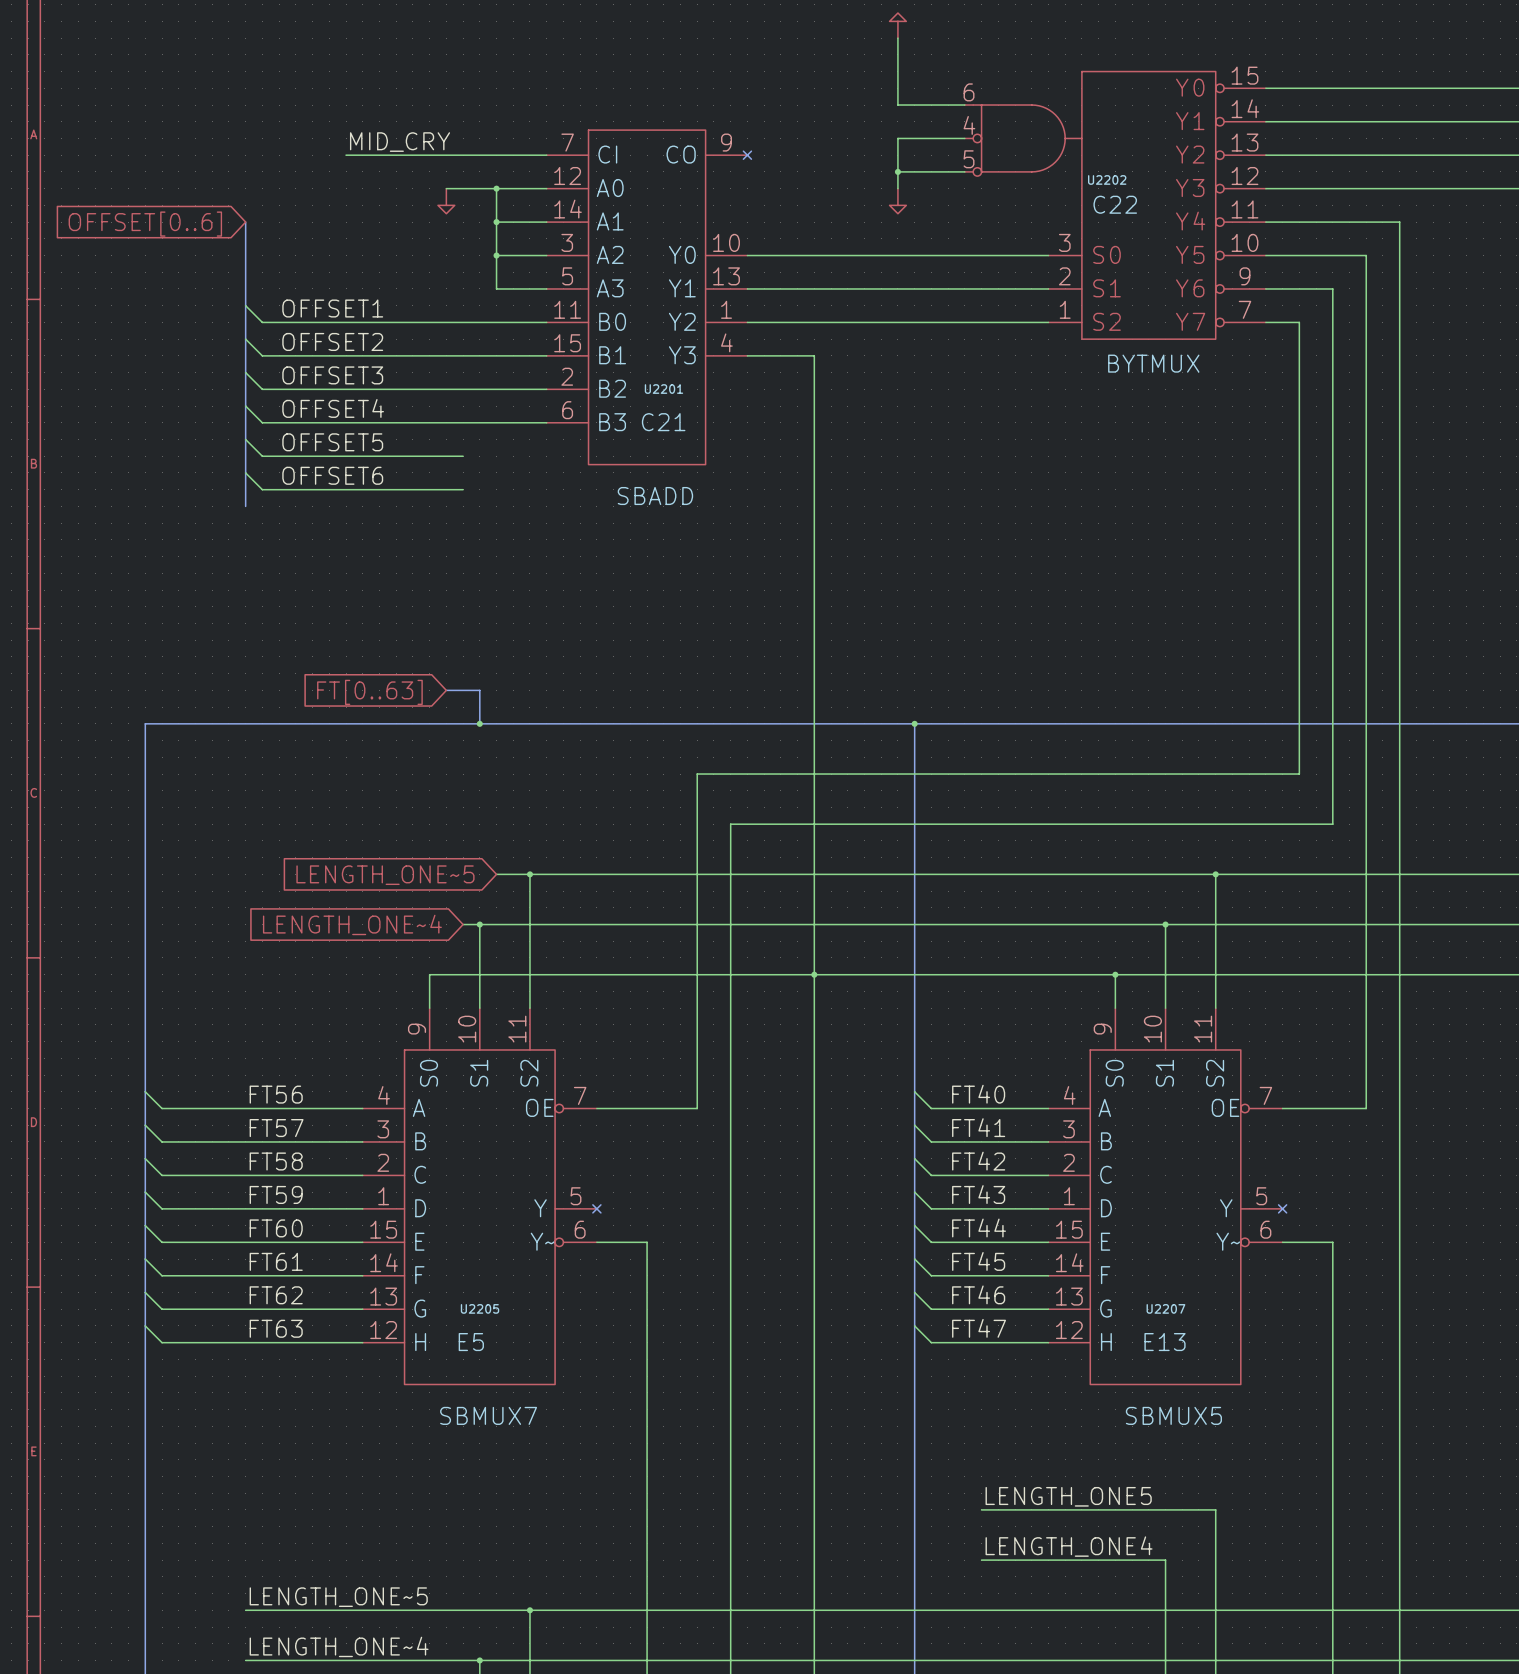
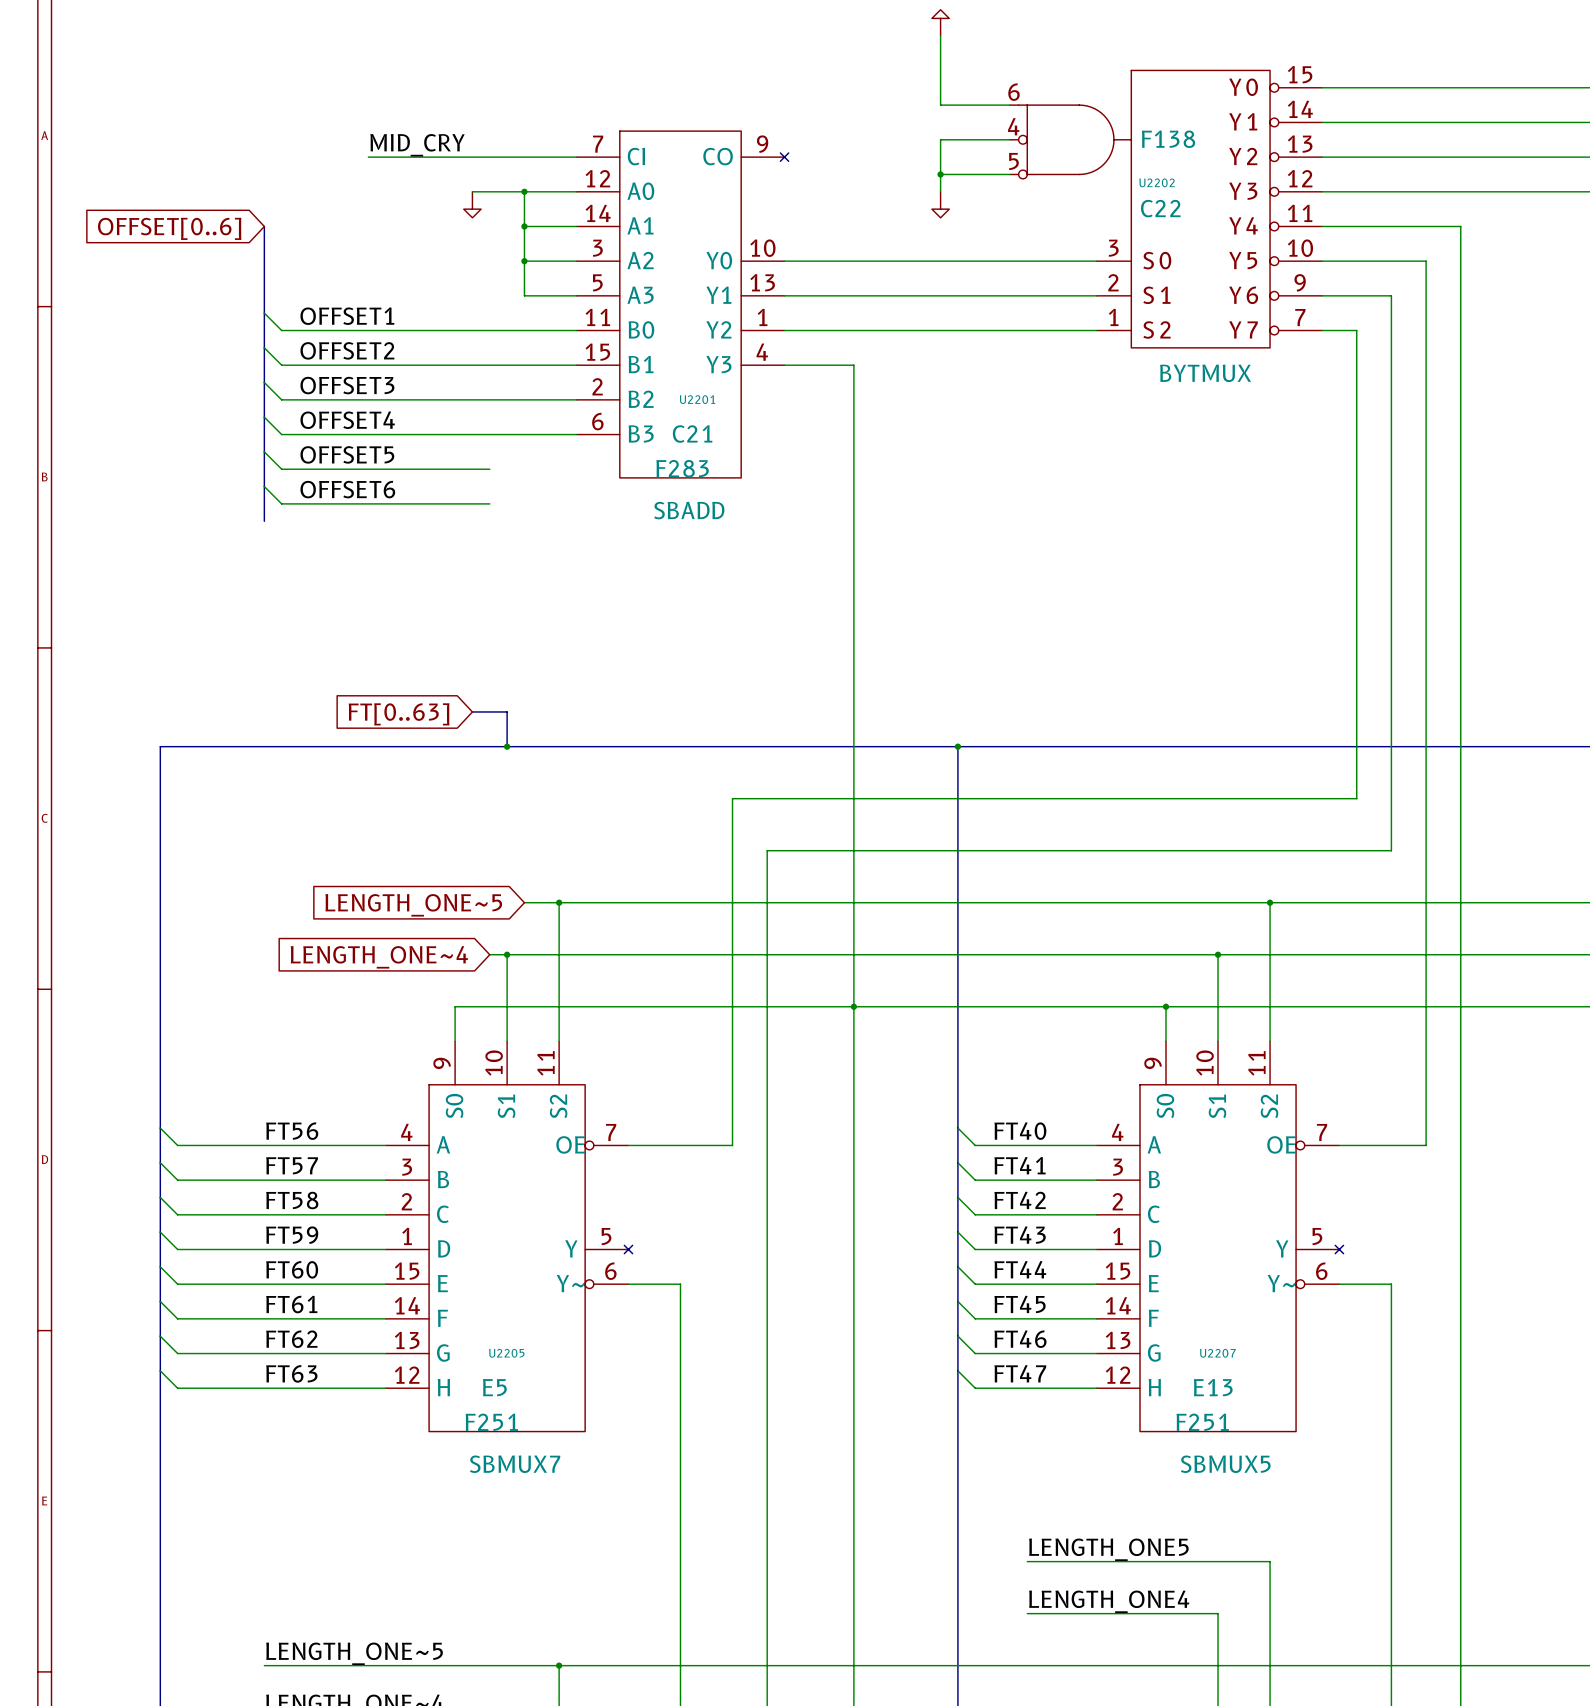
U2202 value: none -> F138 (1168, 139)
U2201 value: none -> F283 (682, 468)
U2205 value: none -> F251 (491, 1422)
U2207 value: none -> F251 (1202, 1422)

